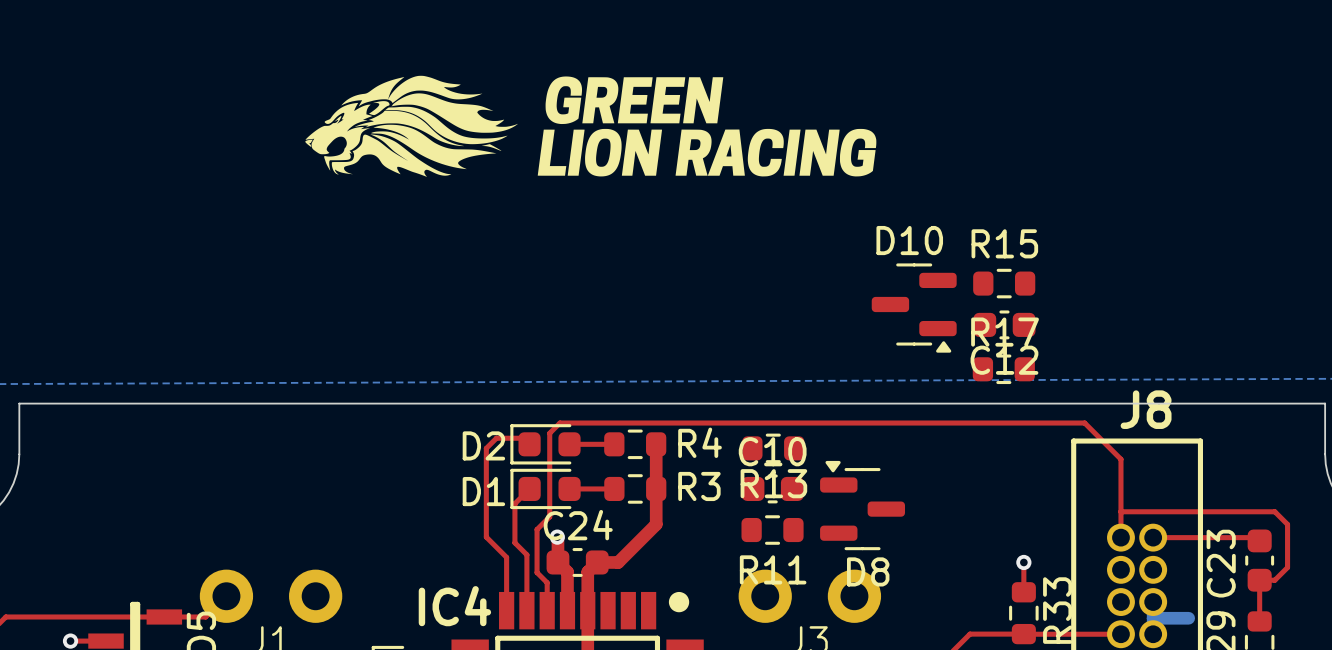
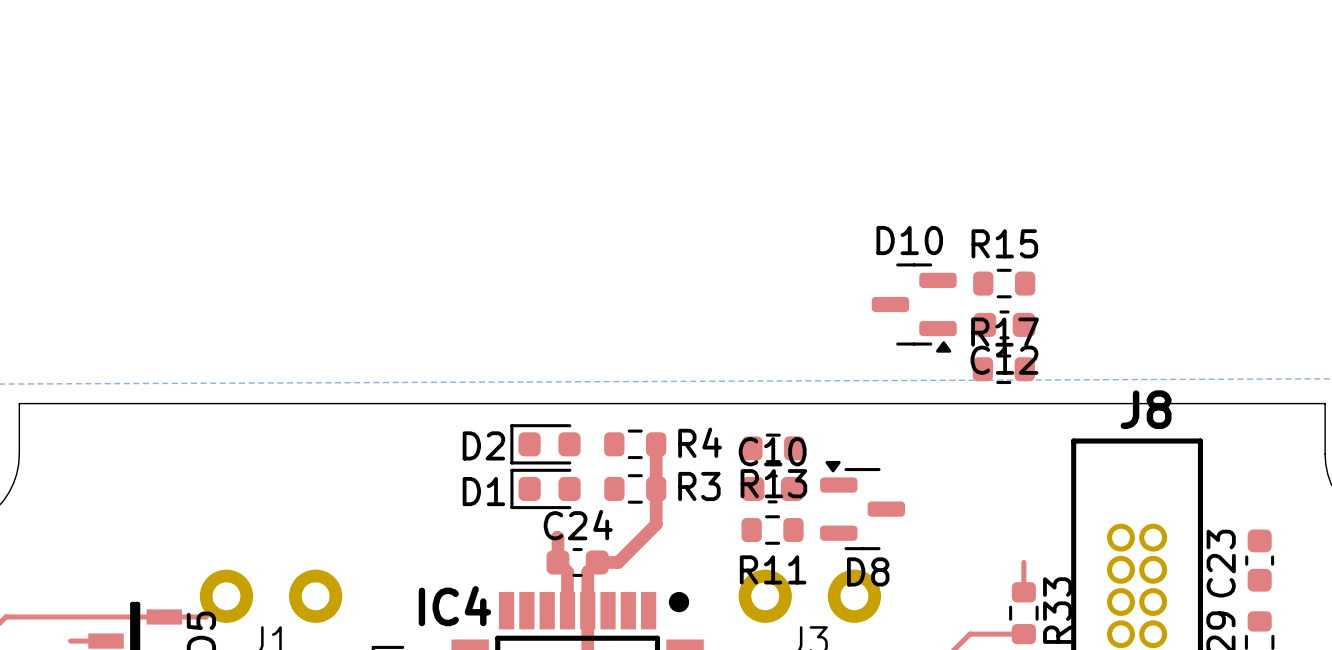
drawing: [305, 75, 877, 177] -> none
top track: (529, 444) (523, 438) (496, 438) (486, 448) (486, 537) (506, 557) (506, 610) -> none
top track: (569, 444) (614, 444) -> none
top track: (529, 488) (514, 503) (514, 542) (526, 554) (526, 610) -> none
top track: (569, 488) (614, 488) -> none
top track: (1120, 511) (1274, 511) (1287, 524) (1287, 567) (1274, 580) (1259, 580) (1259, 621) -> none
via: (557, 537) -> none
top track: (1120, 537) (1120, 459) (1084, 423) (559, 423) (549, 433) (549, 516) (537, 529) (537, 572) (547, 582) (547, 610) -> none
top track: (1153, 537) (1256, 537) (1259, 540) -> none
via: (1023, 562) -> none
bottom track: (1153, 618) (1188, 618) -> none
top track: (1026, 634) (1120, 634) -> none
via: (70, 641) -> none

